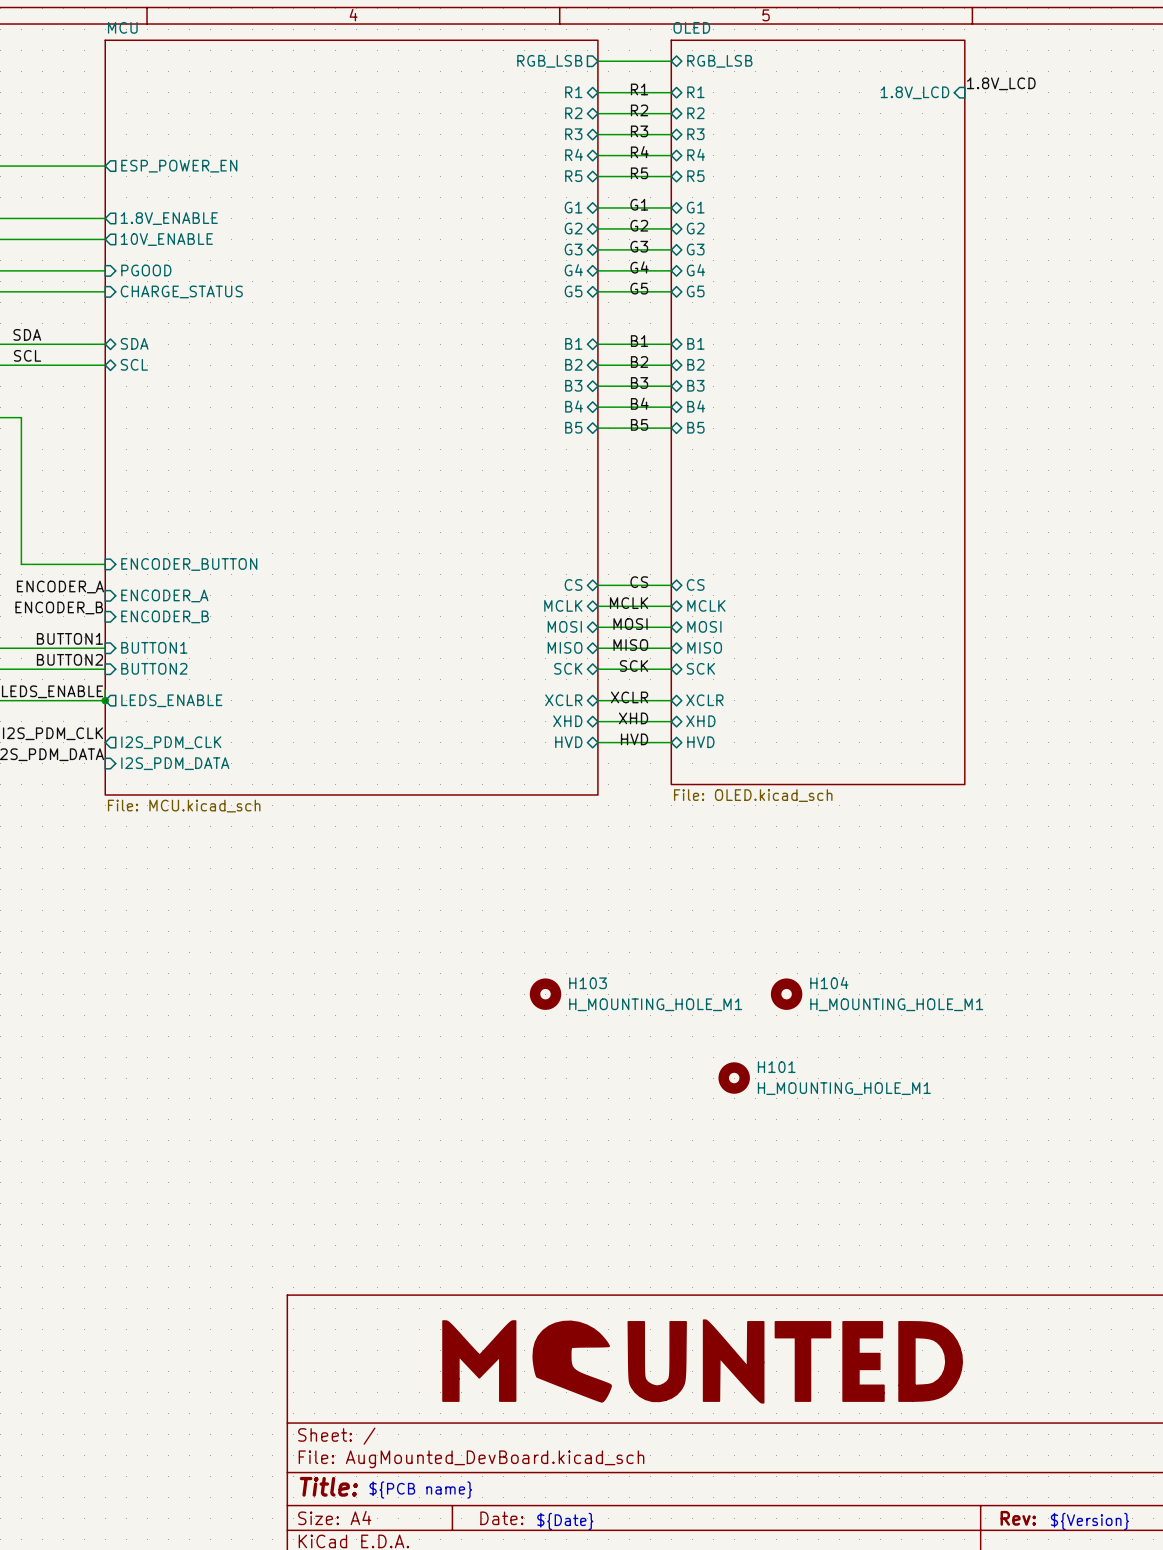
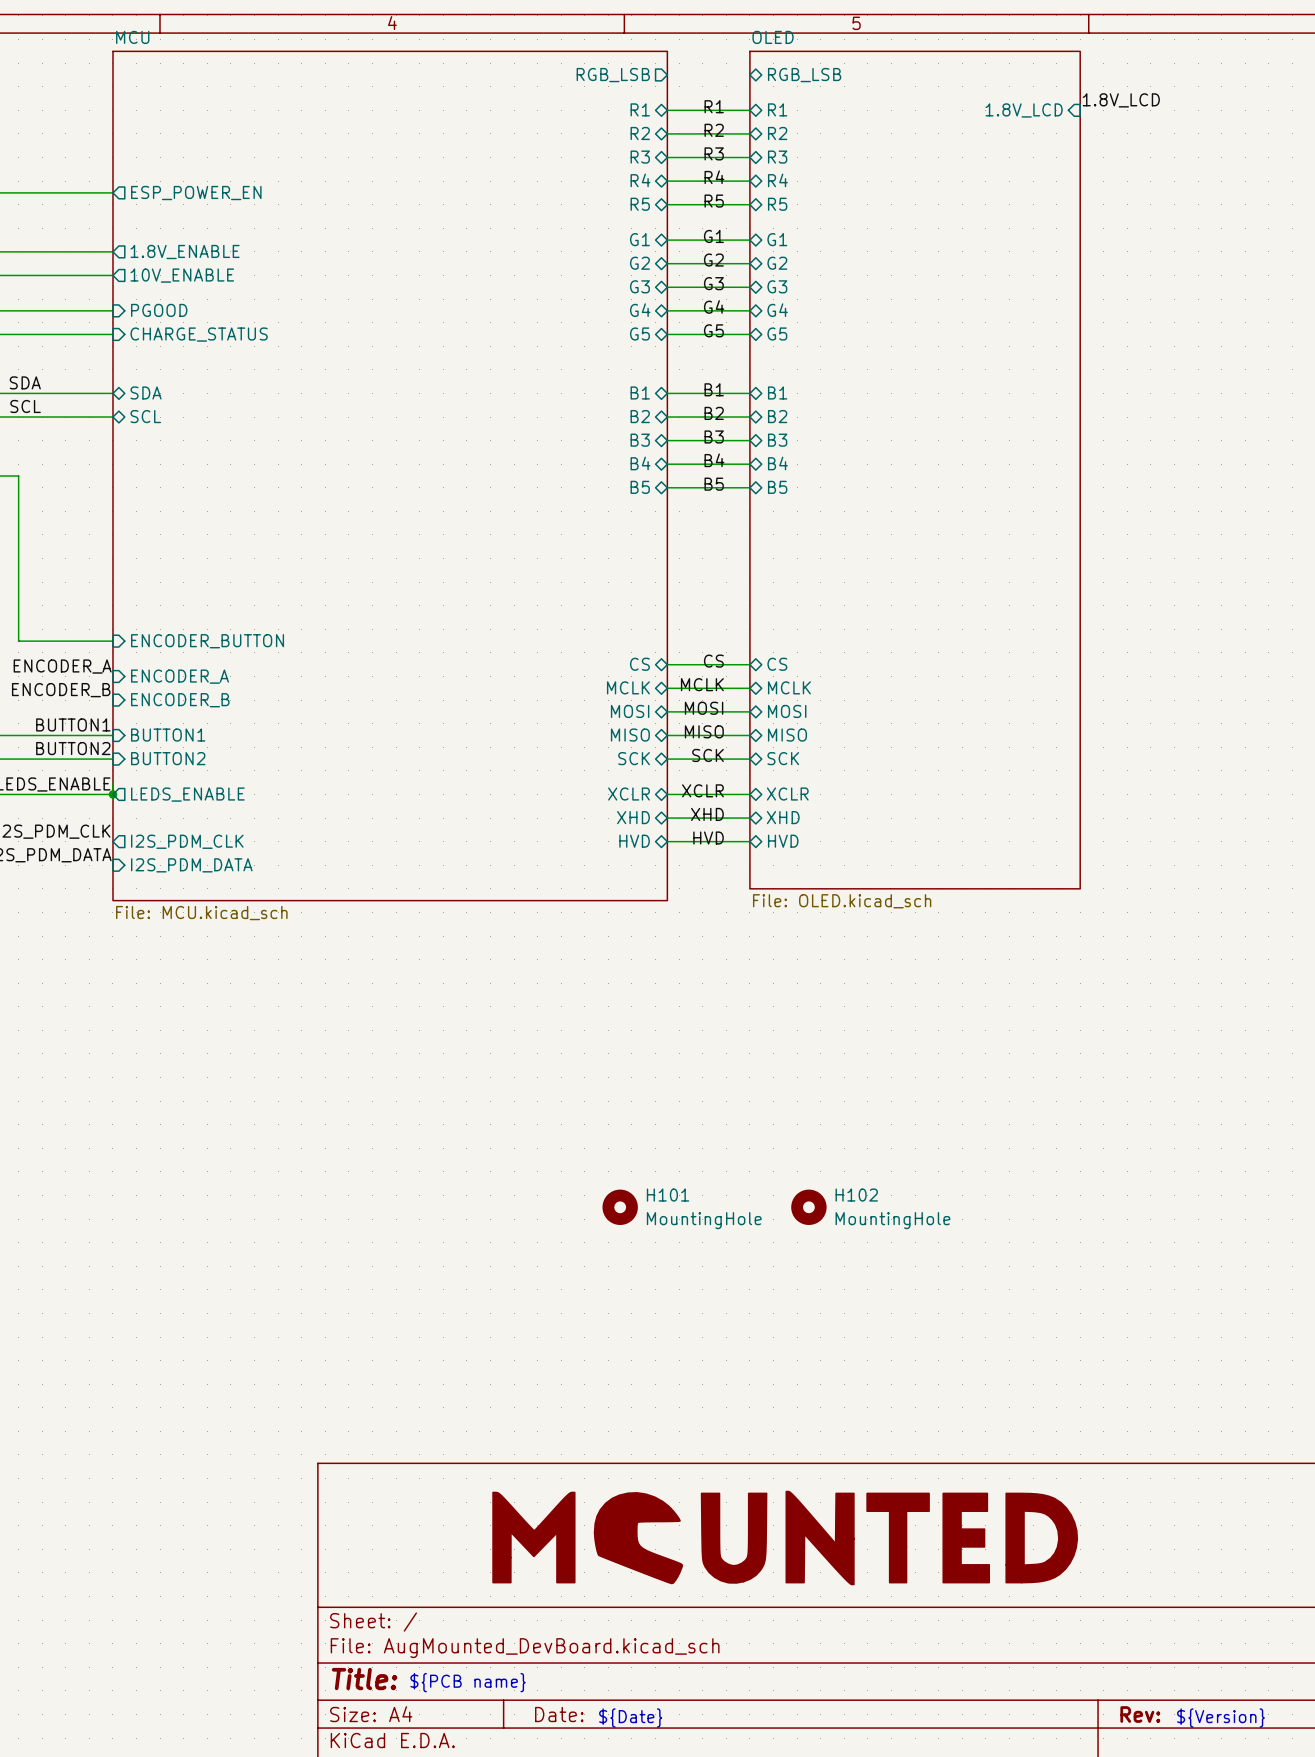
wire: (597, 61) (671, 61) -> none
H103: H_MOUNTING_HOLE_M1 (545, 994) -> none
H104: H_MOUNTING_HOLE_M1 (786, 994) -> none
H102: none -> MountingHole (808, 1207)
H101 position: (734, 1078) -> (620, 1207)
H101 value: H_MOUNTING_HOLE_M1 (844, 1088) -> MountingHole (704, 1220)

